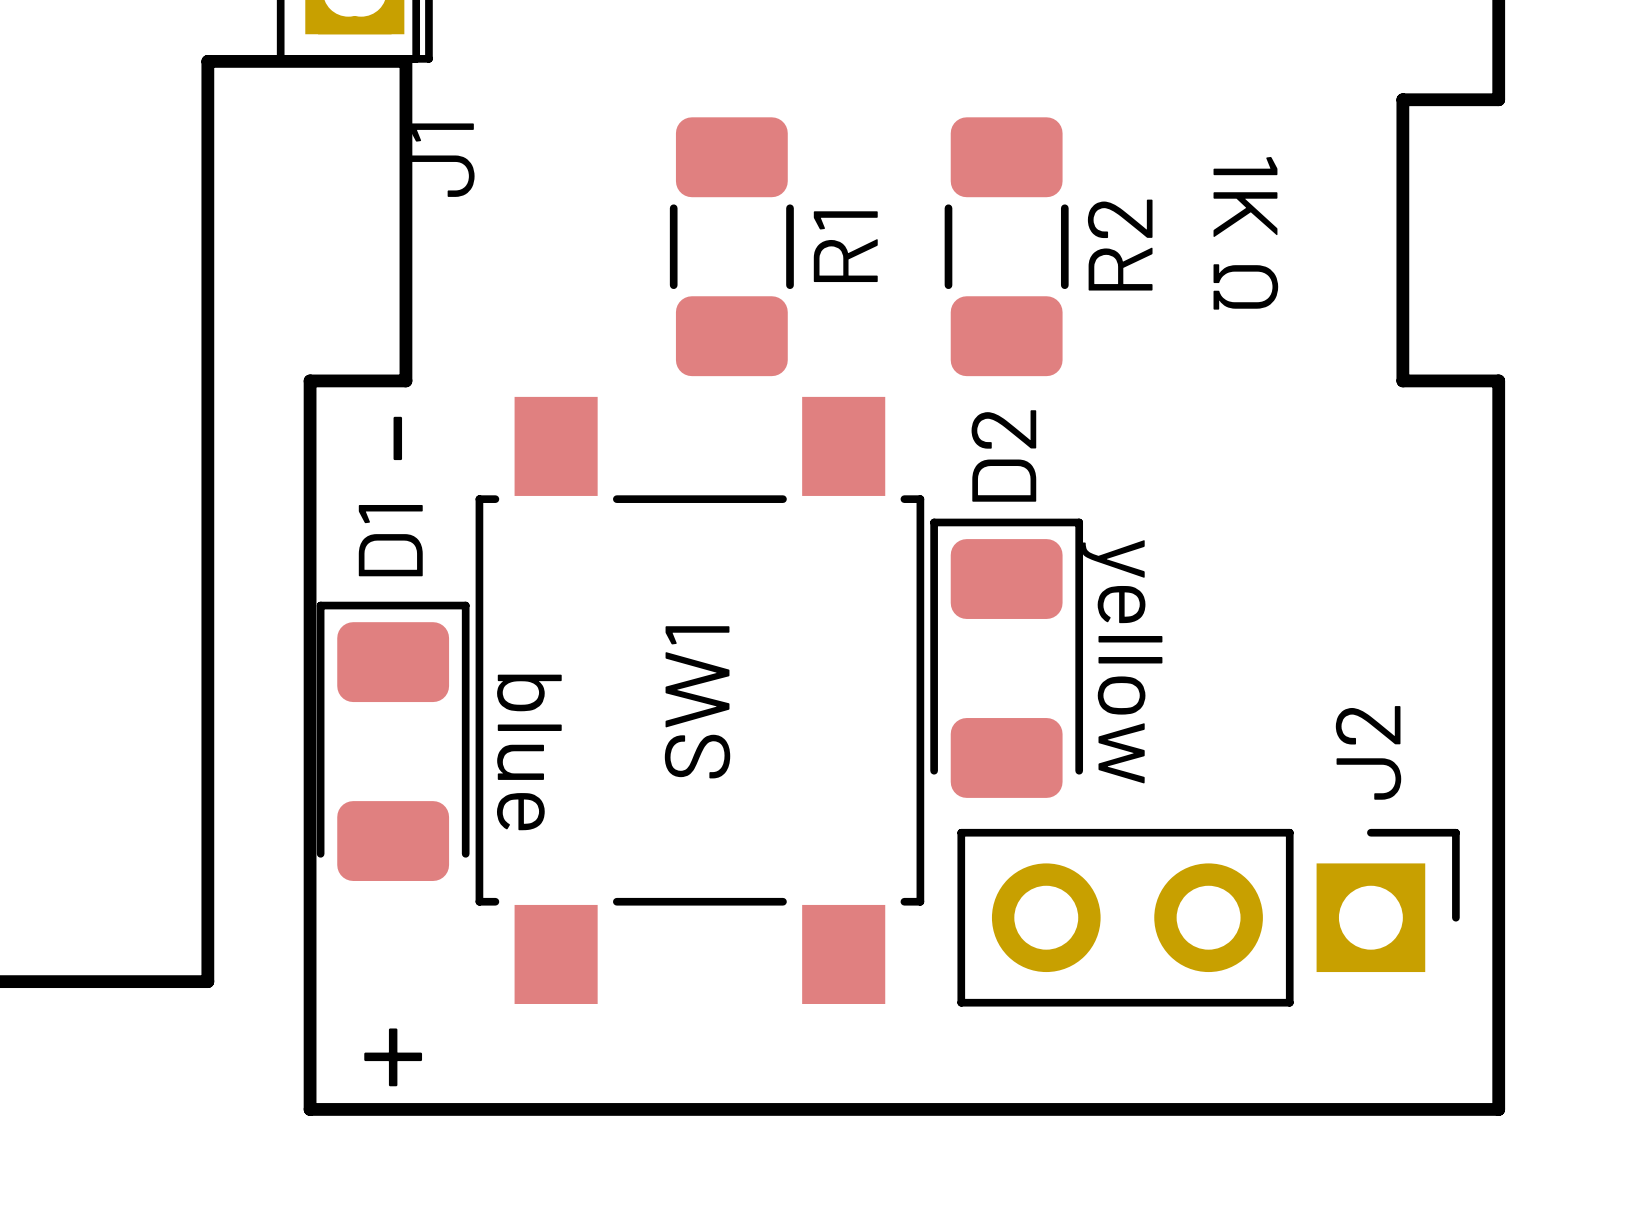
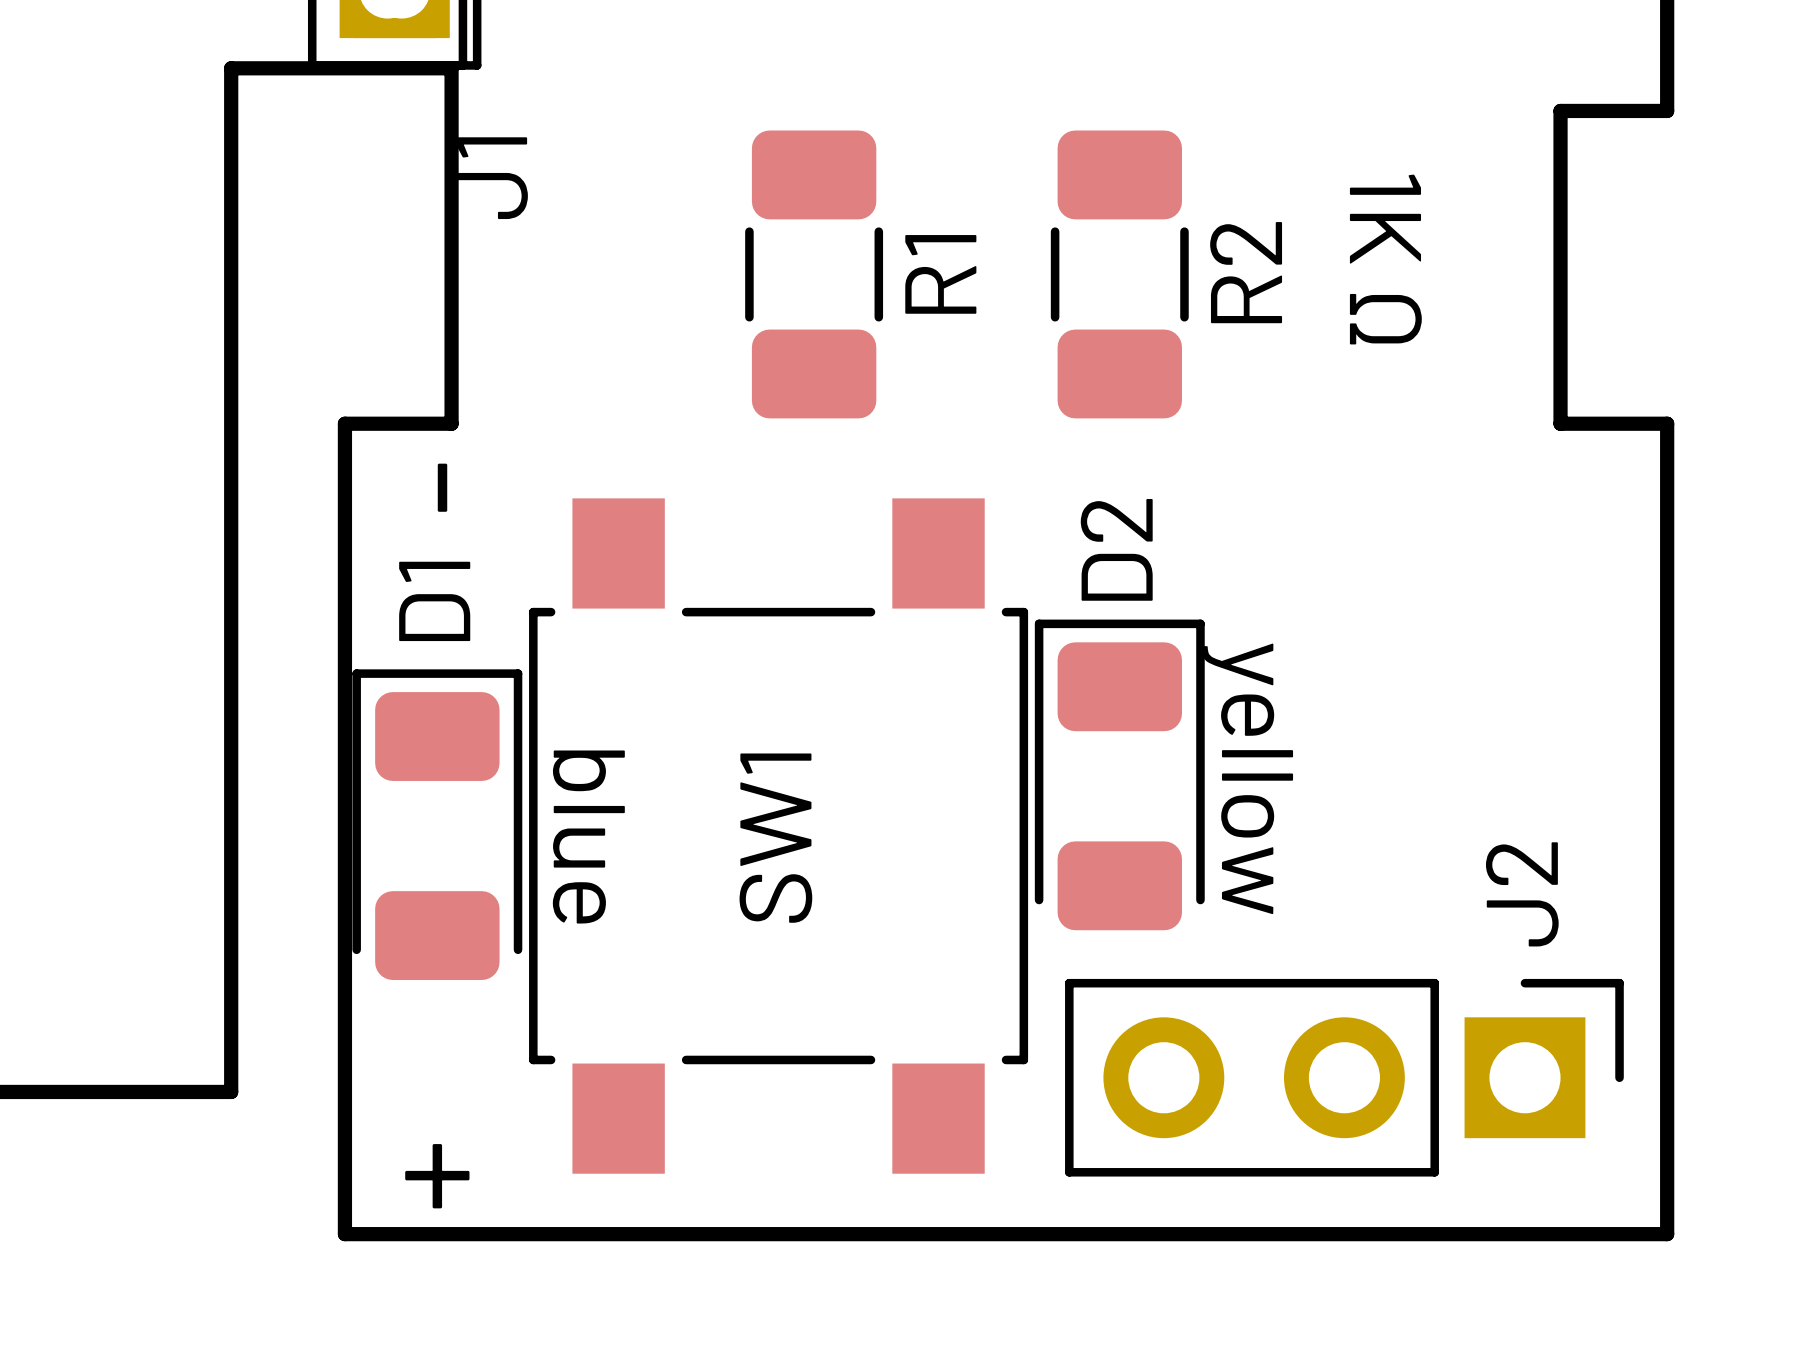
D2 position: (1006, 658) -> (1119, 774)
text position: yellow (1121, 661) -> yellow (1247, 778)
SW1 position: (699, 700) -> (778, 836)
J2 position: (1208, 917) -> (1344, 1077)

